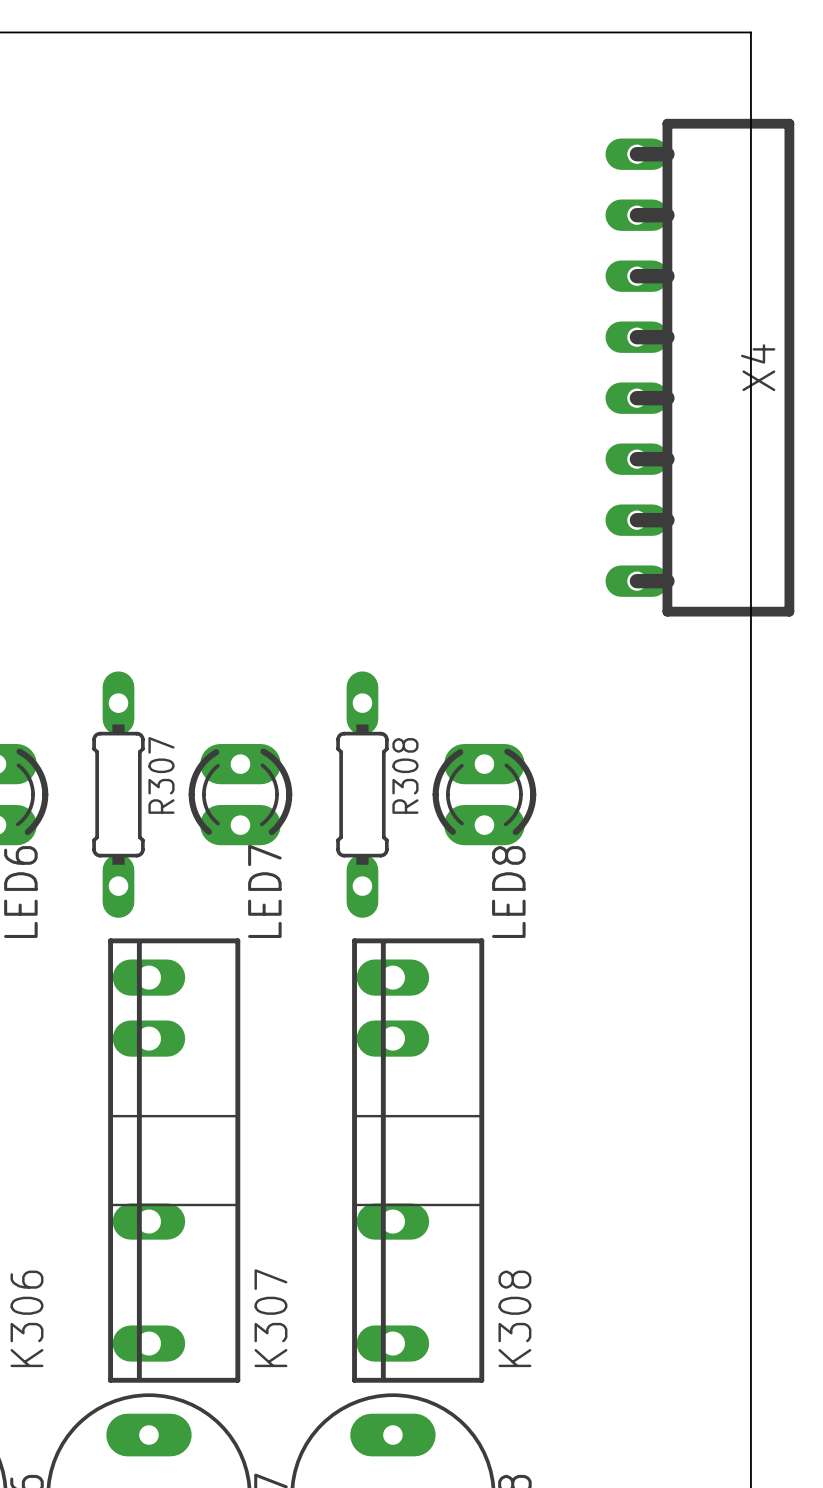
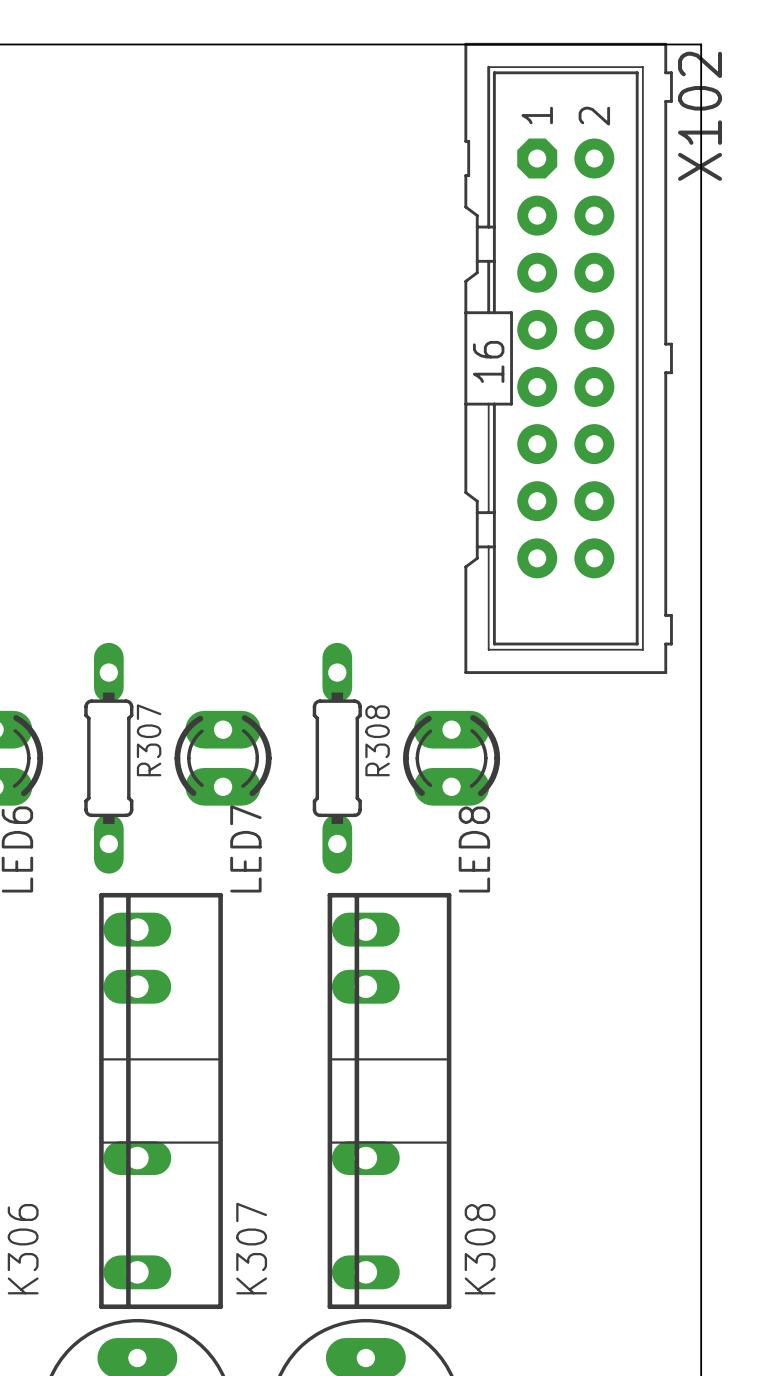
X102: none -> (568, 358)
X4: (699, 367) -> none

